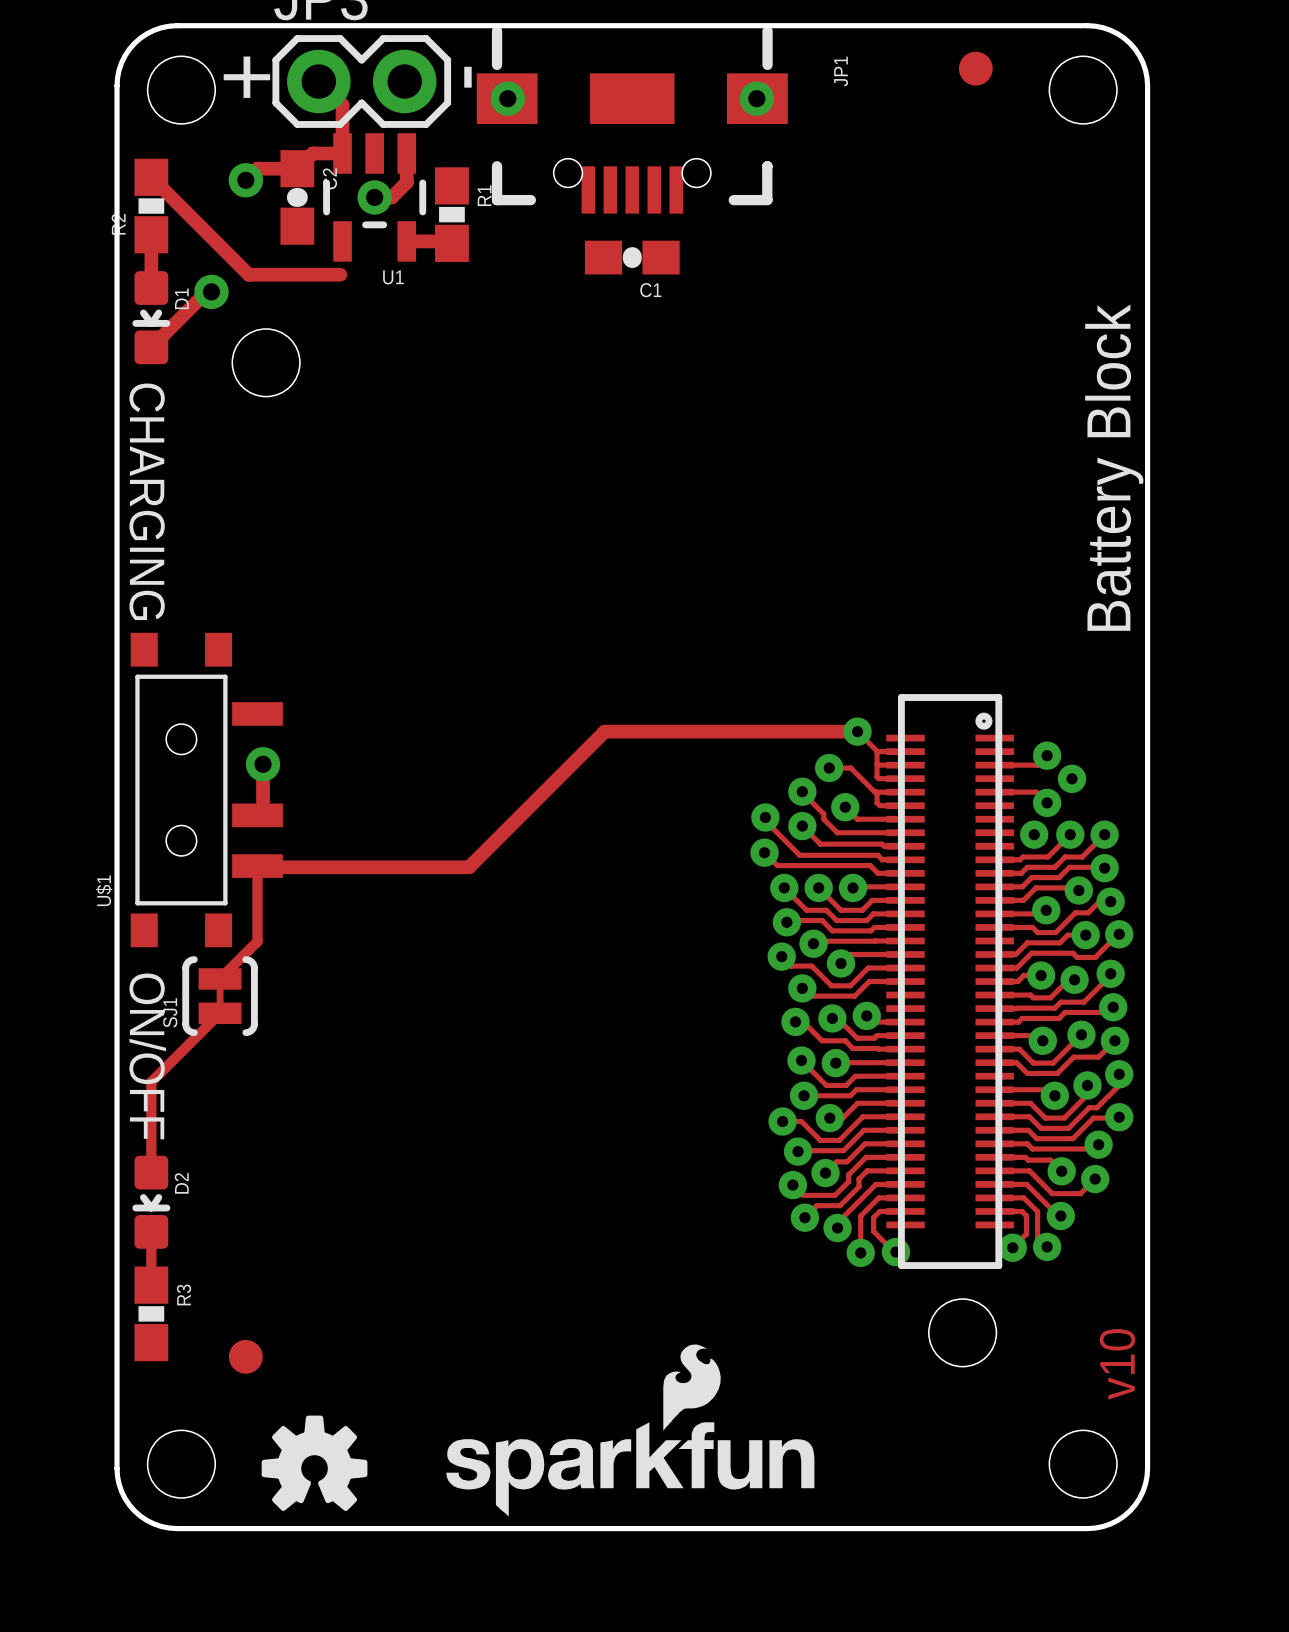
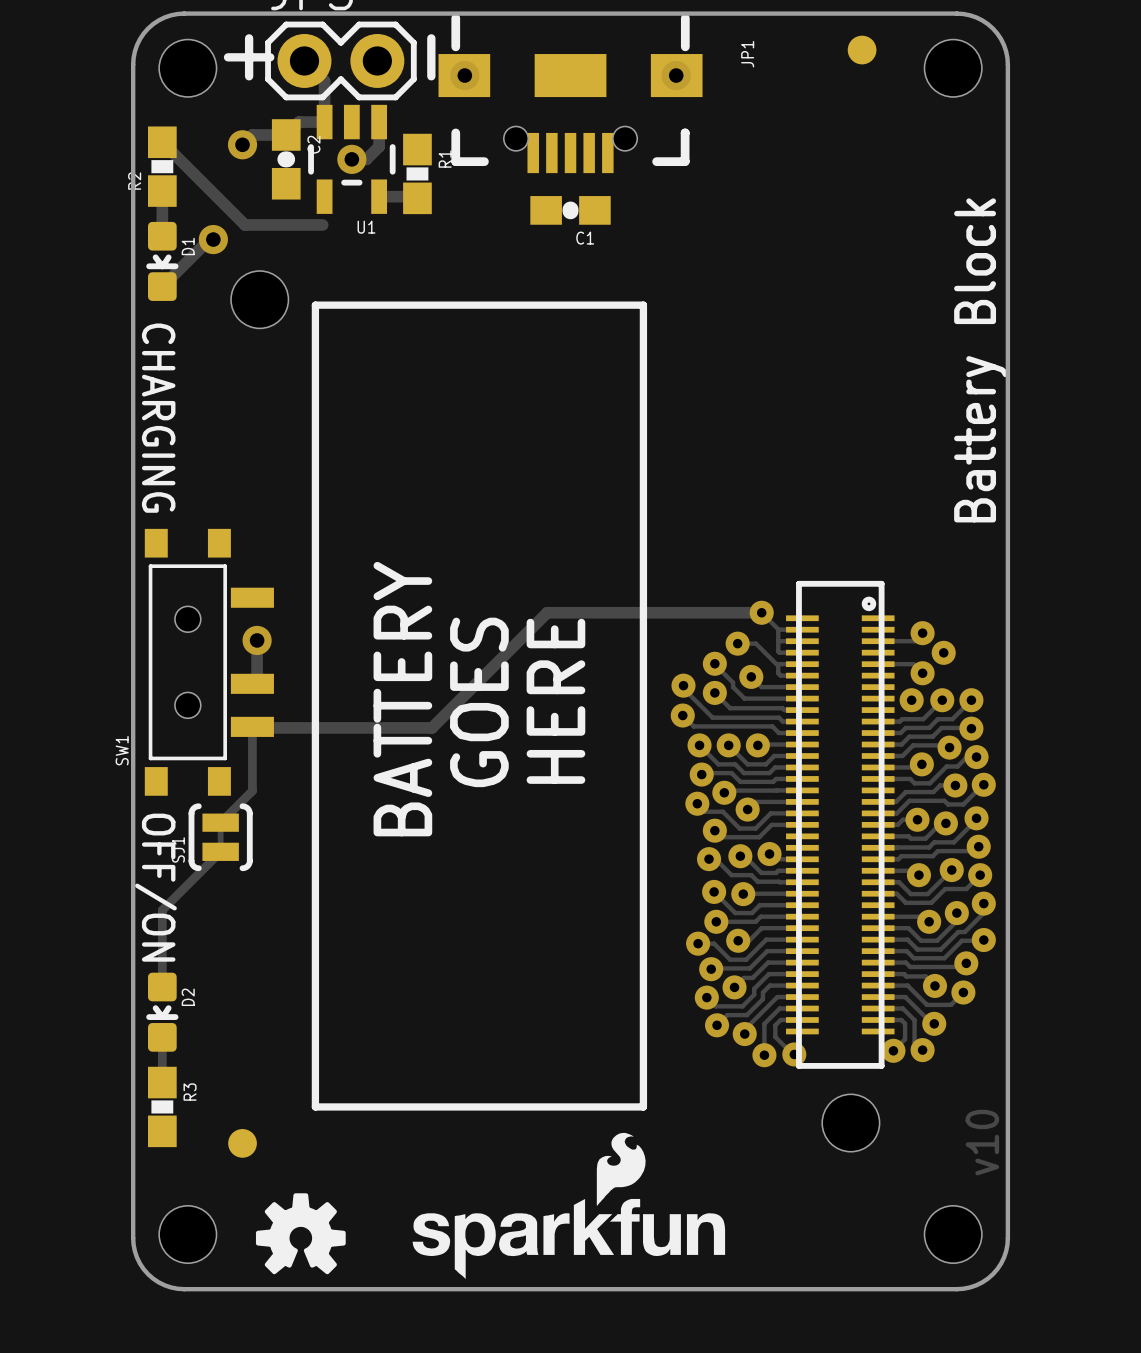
line: none -> (315, 305) (643, 305) (643, 1106) (315, 1106) (315, 305)
text: none -> BATTERY (402, 699)
text: none -> HERE (555, 701)
text: none -> GOES (479, 702)
U$1 name: U$1 (104, 890) -> SW1 (122, 750)
text: ON/OFF (147, 1056) -> OFF/ON (155, 887)

